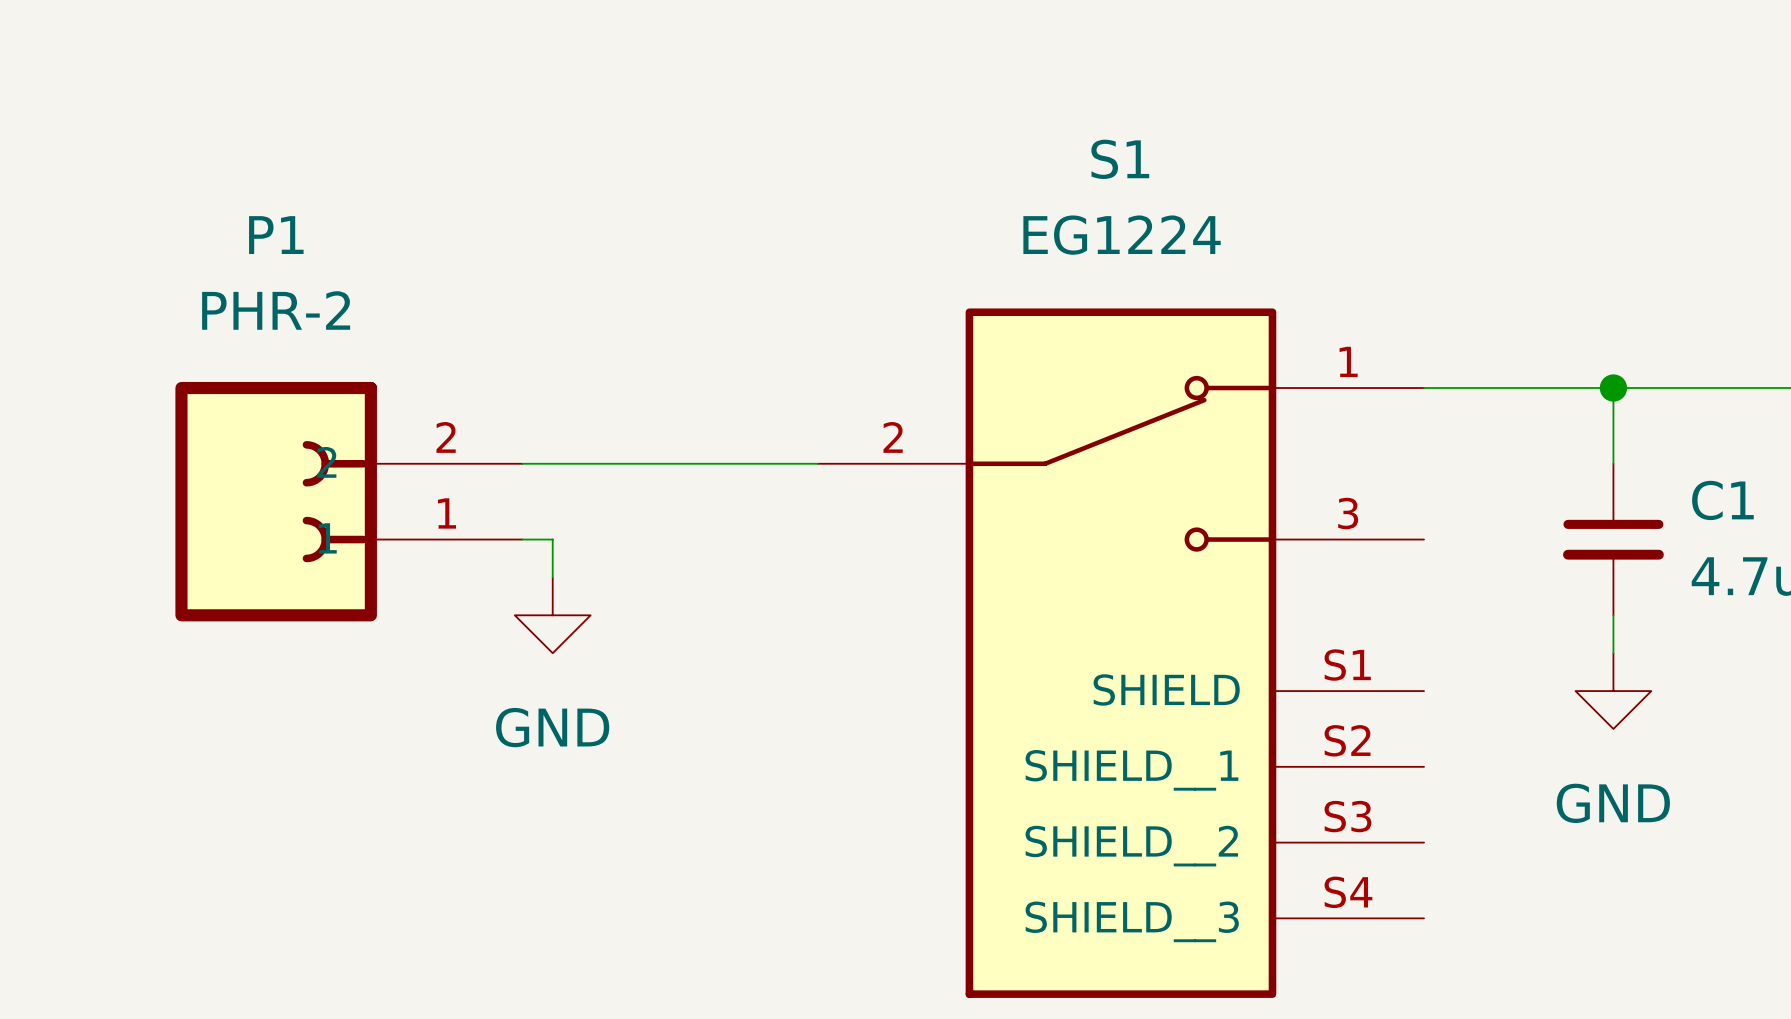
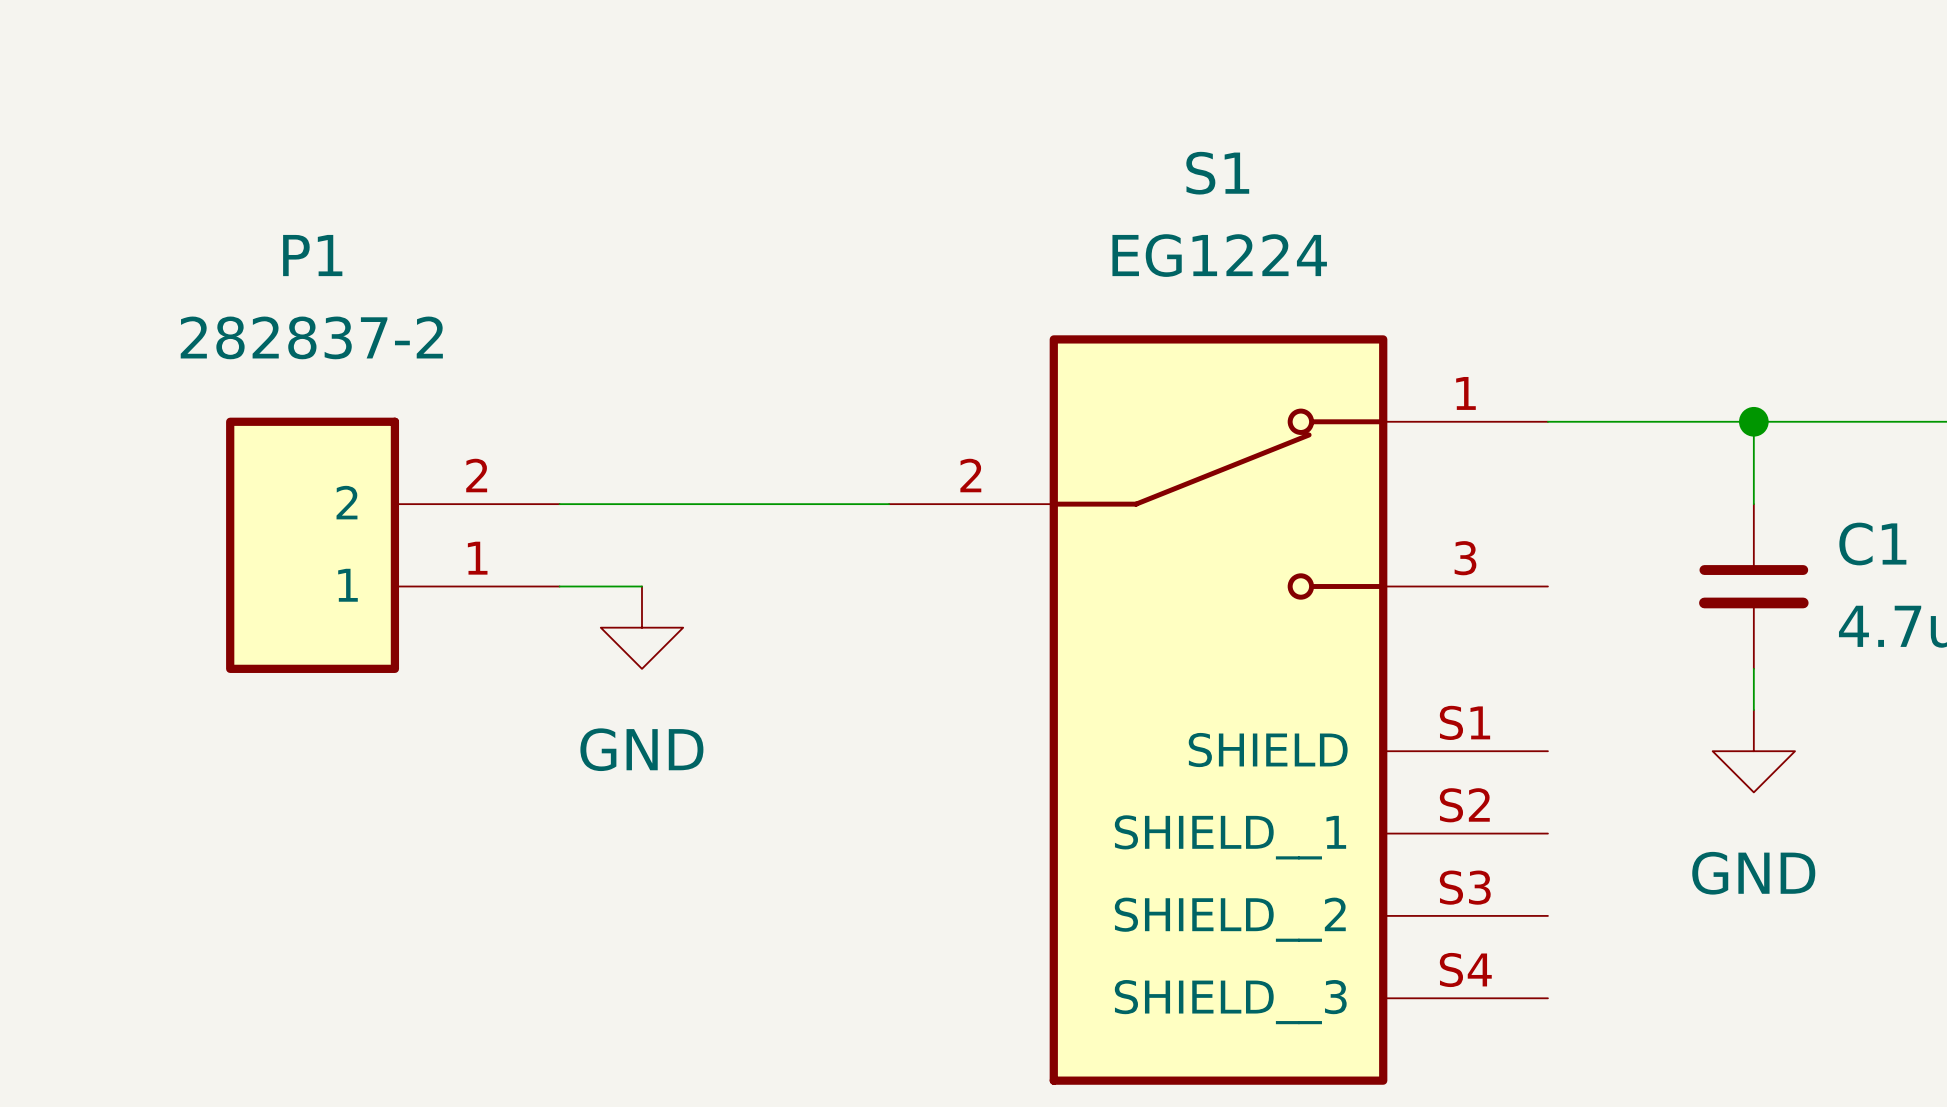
P1 value: PHR-2 (276, 310) -> 282837-2 (311, 337)
P1 symbol: [175, 381, 523, 622] -> [226, 417, 560, 673]
wire: (552, 539) (552, 577) -> (600, 586) (641, 586)
power symbol position: GND (552, 615) -> GND (641, 627)

